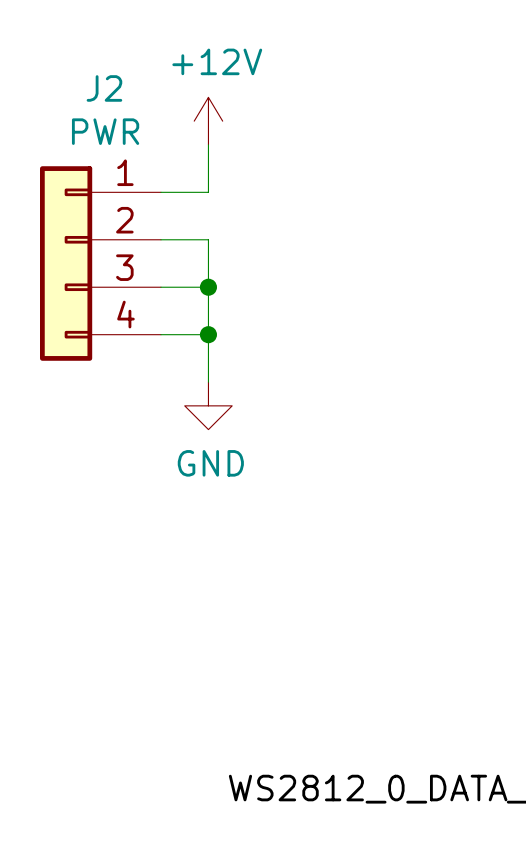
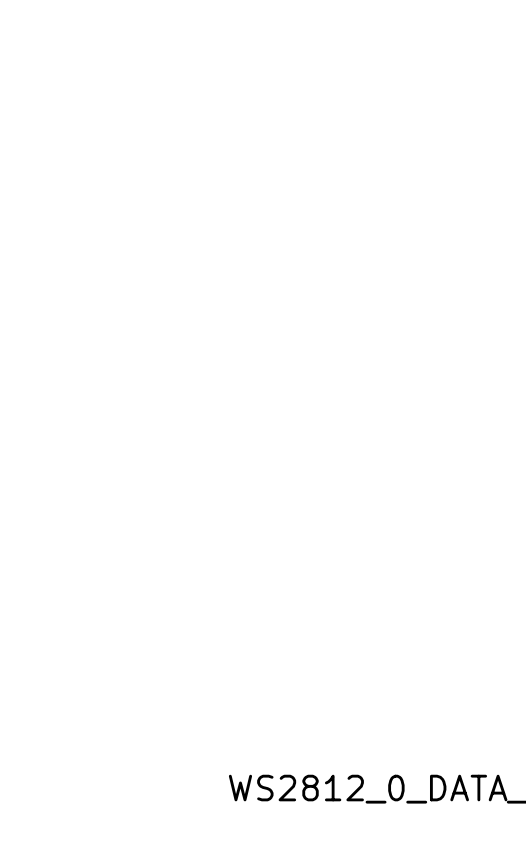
power symbol: +12V (208, 121) -> none
wire: (208, 144) (208, 192) (161, 192) -> none
wire: (161, 239) (208, 239) (208, 382) -> none
J2: PWR (100, 263) -> none
wire: (161, 287) (208, 287) -> none
junction: (208, 287) -> none
wire: (161, 334) (208, 334) -> none
junction: (208, 334) -> none
power symbol: GND (208, 405) -> none

